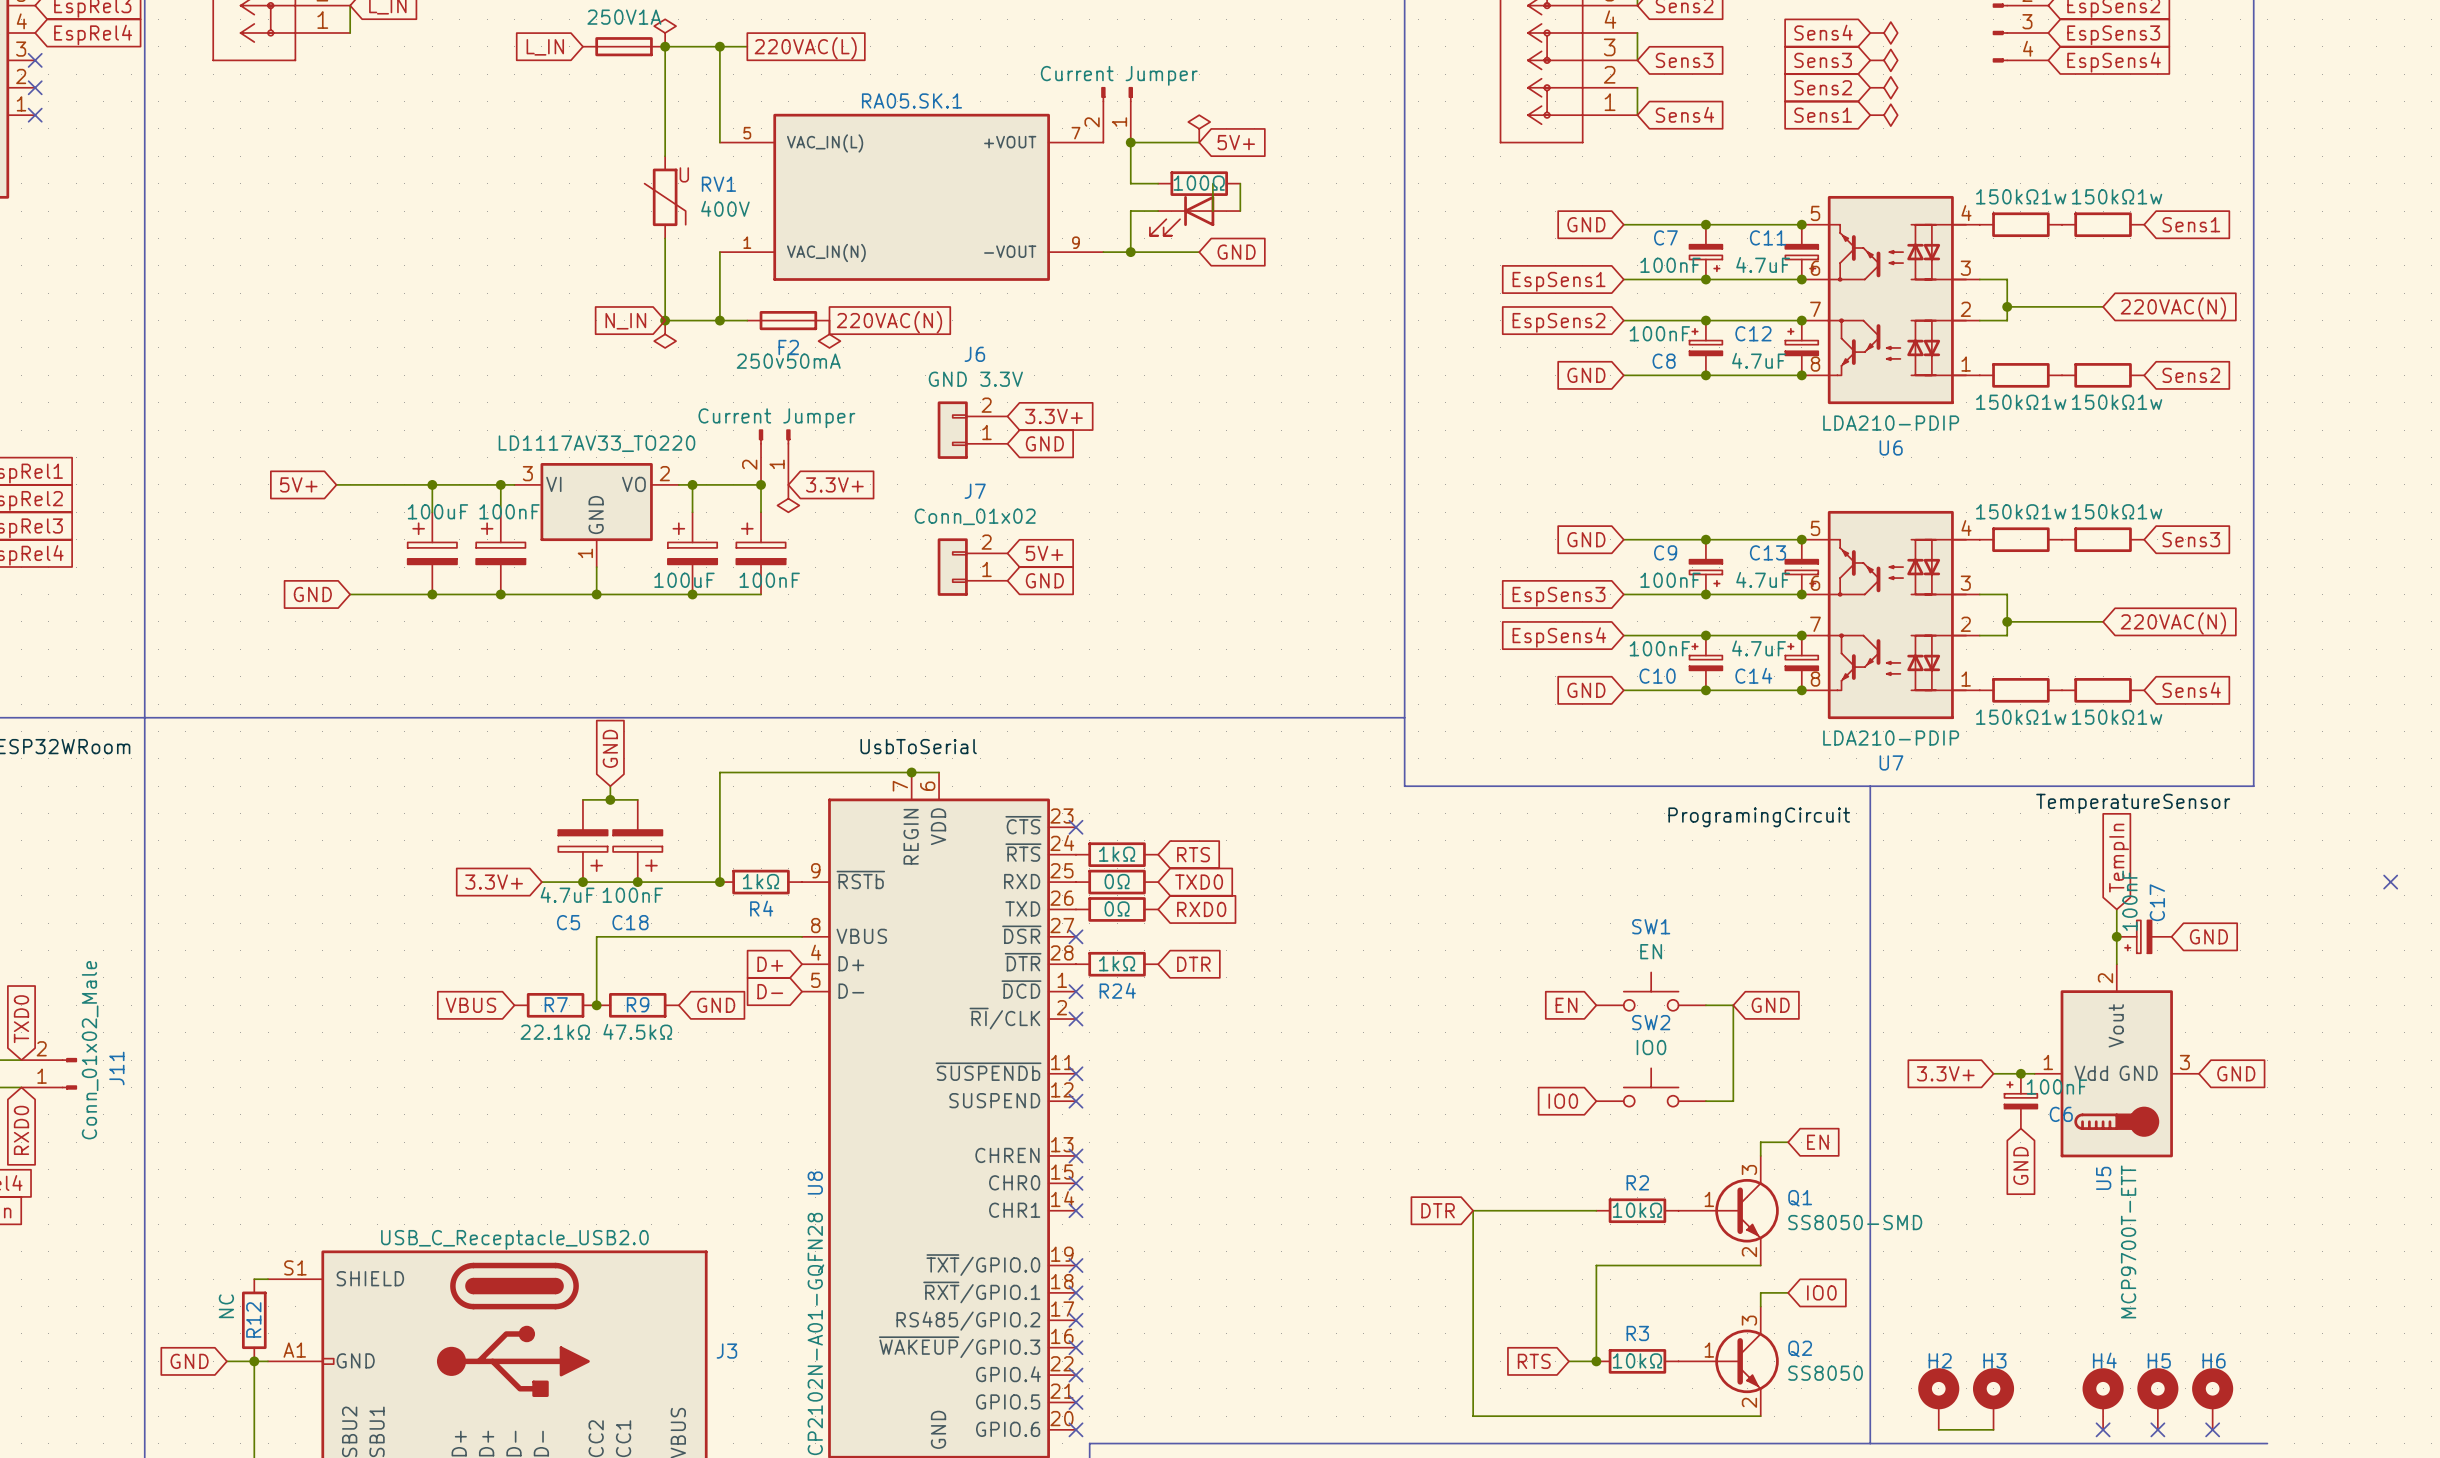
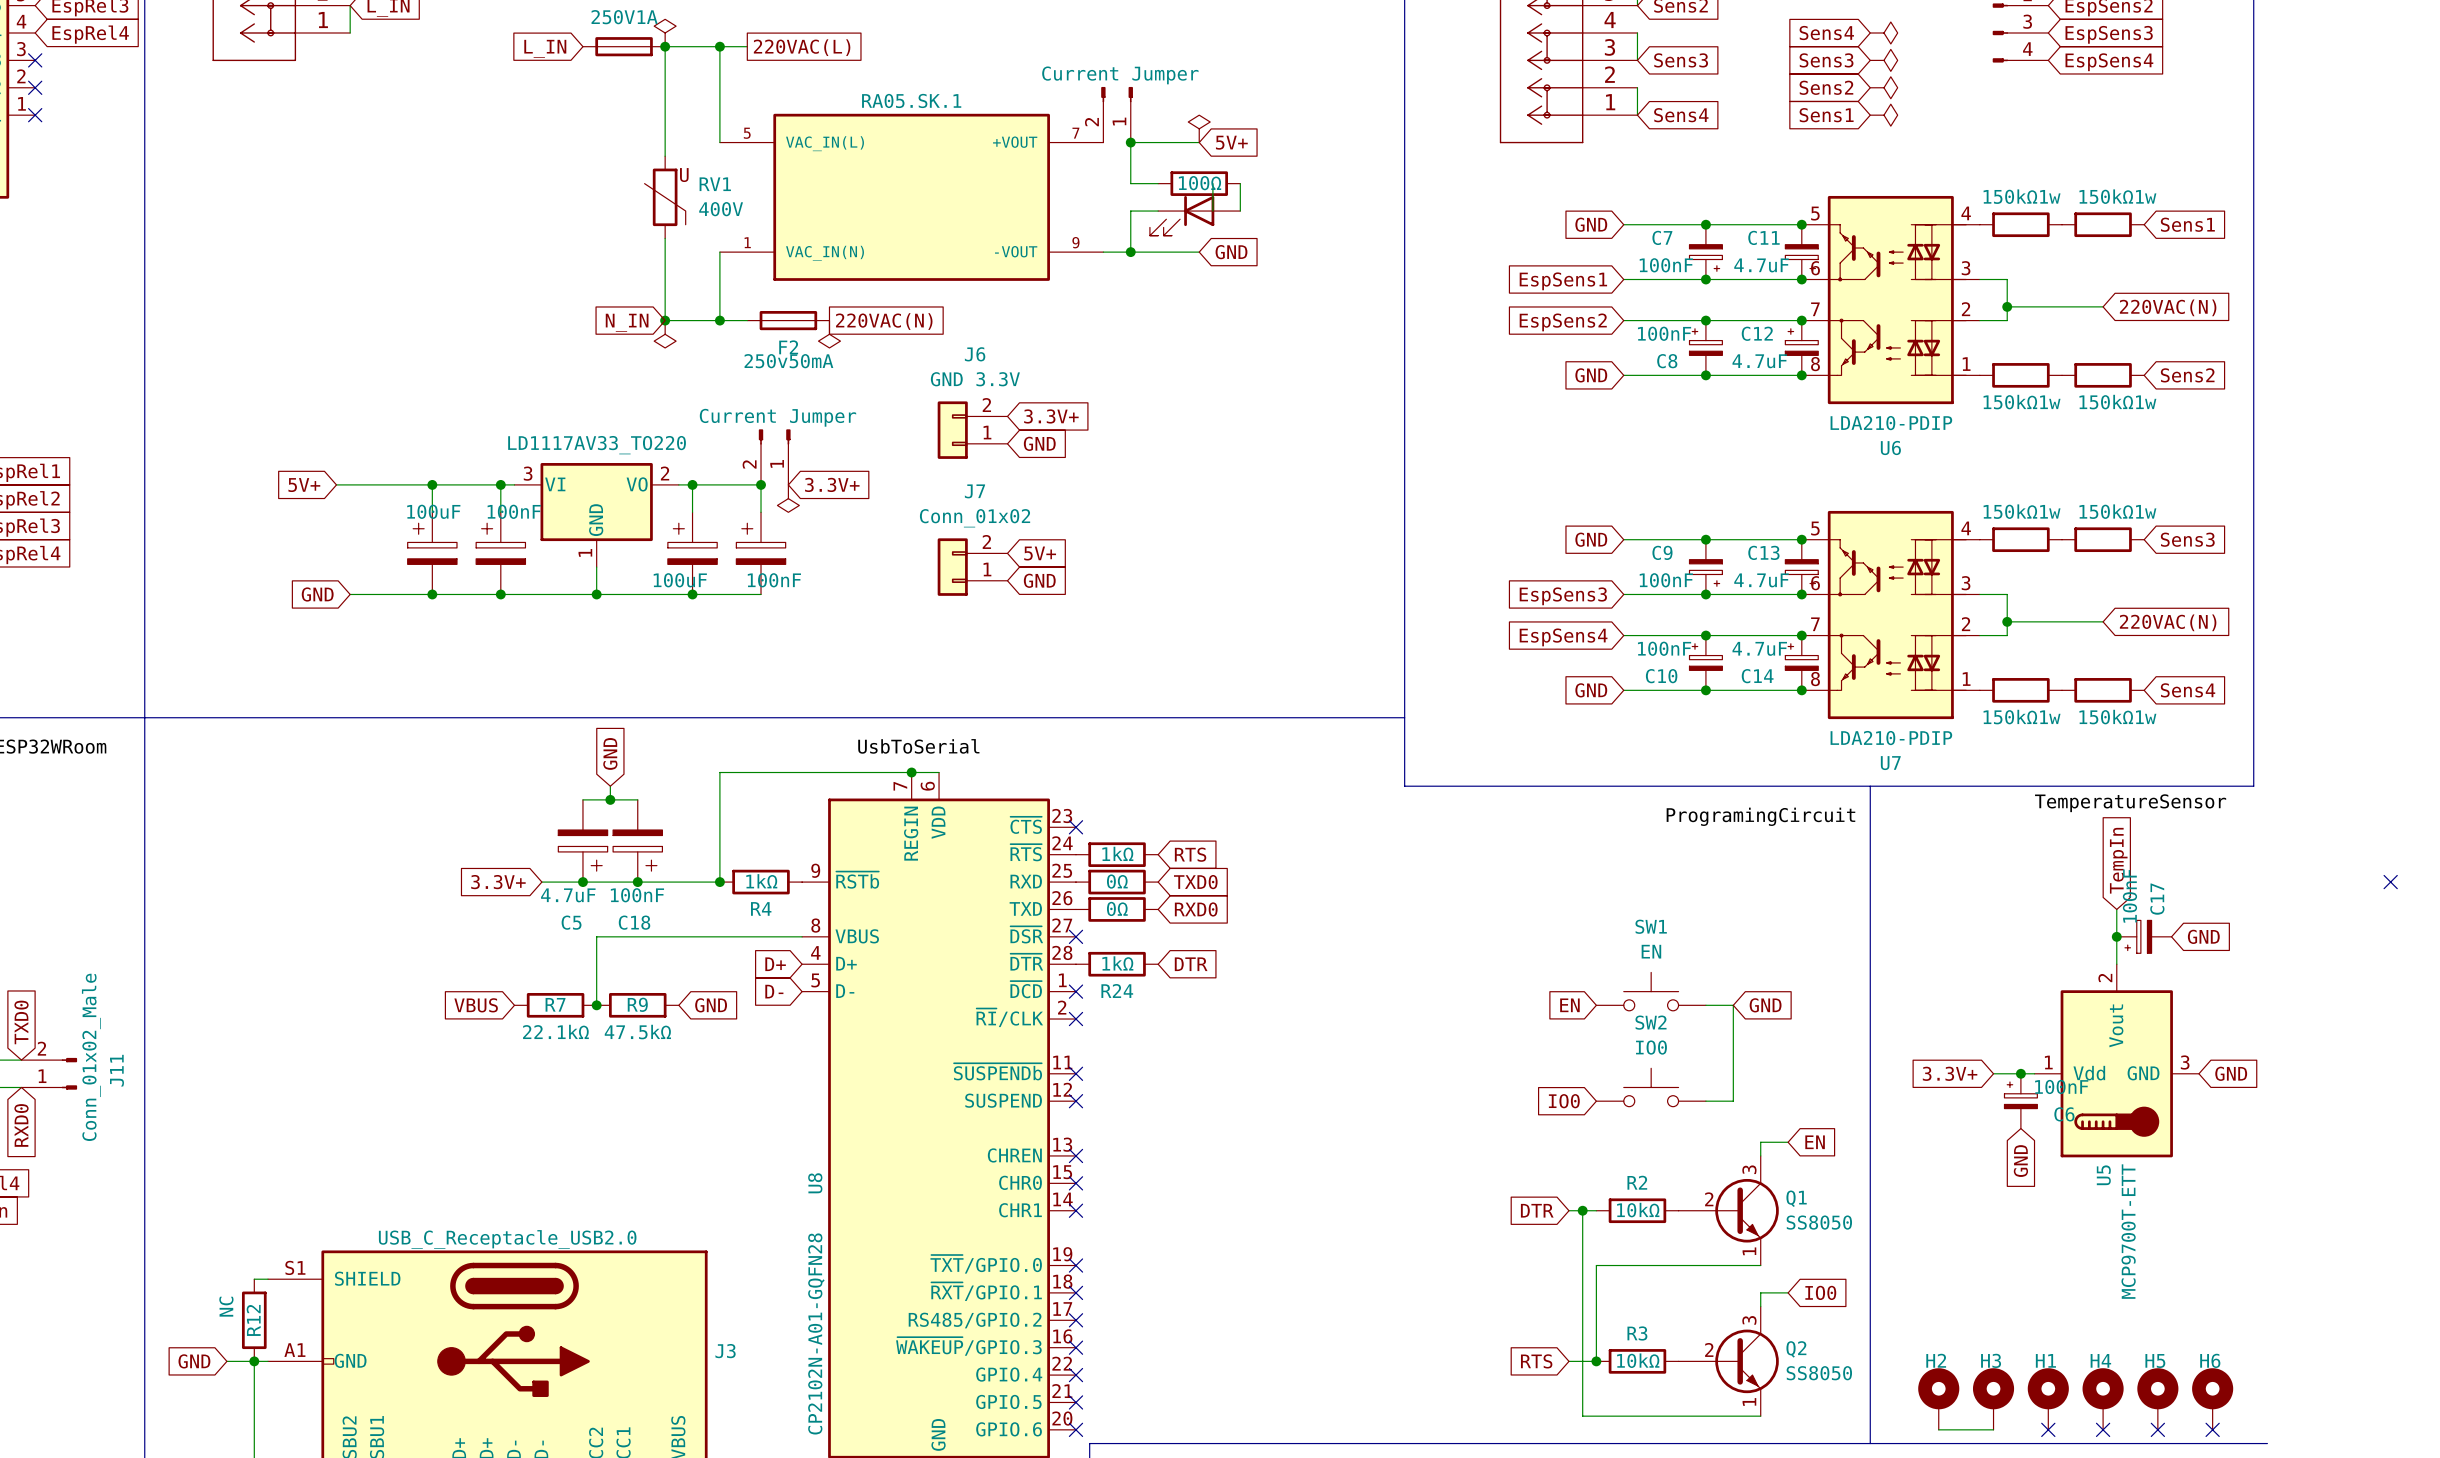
Q1 pin number: 1 (1709, 1199) -> 2 (1709, 1199)
global label position: DTR (1438, 1210) -> DTR (1537, 1210)
wire: (1568, 1210) (1473, 1210) (1473, 1416) (1582, 1416) -> (1582, 1210) (1582, 1416)
junction: none -> (1582, 1210)
Q1 value: SS8050-SMD (1855, 1222) -> SS8050 (1819, 1222)
Q1 pin number: 2 (1749, 1252) -> 1 (1749, 1251)
Q2 pin number: 1 (1709, 1350) -> 2 (1709, 1349)
H1: none -> (2048, 1399)
Q2 pin number: 2 (1749, 1402) -> 1 (1749, 1401)
no-connect mark: none -> (2048, 1429)

